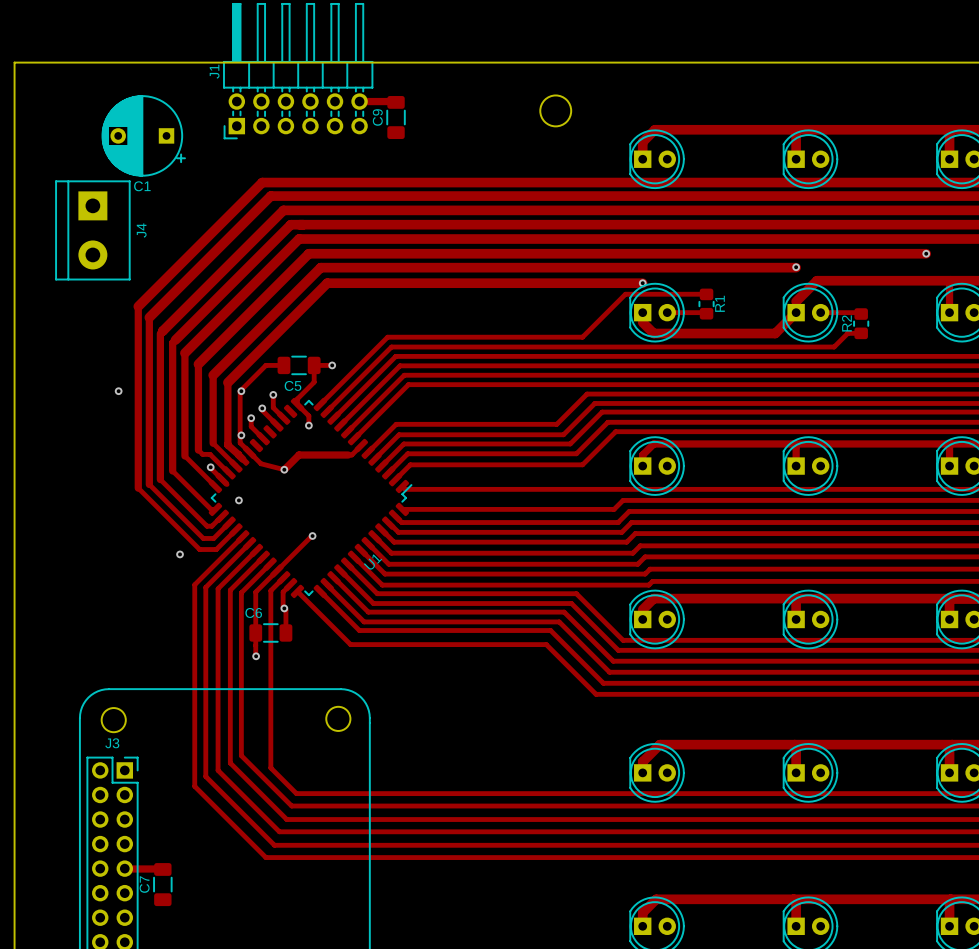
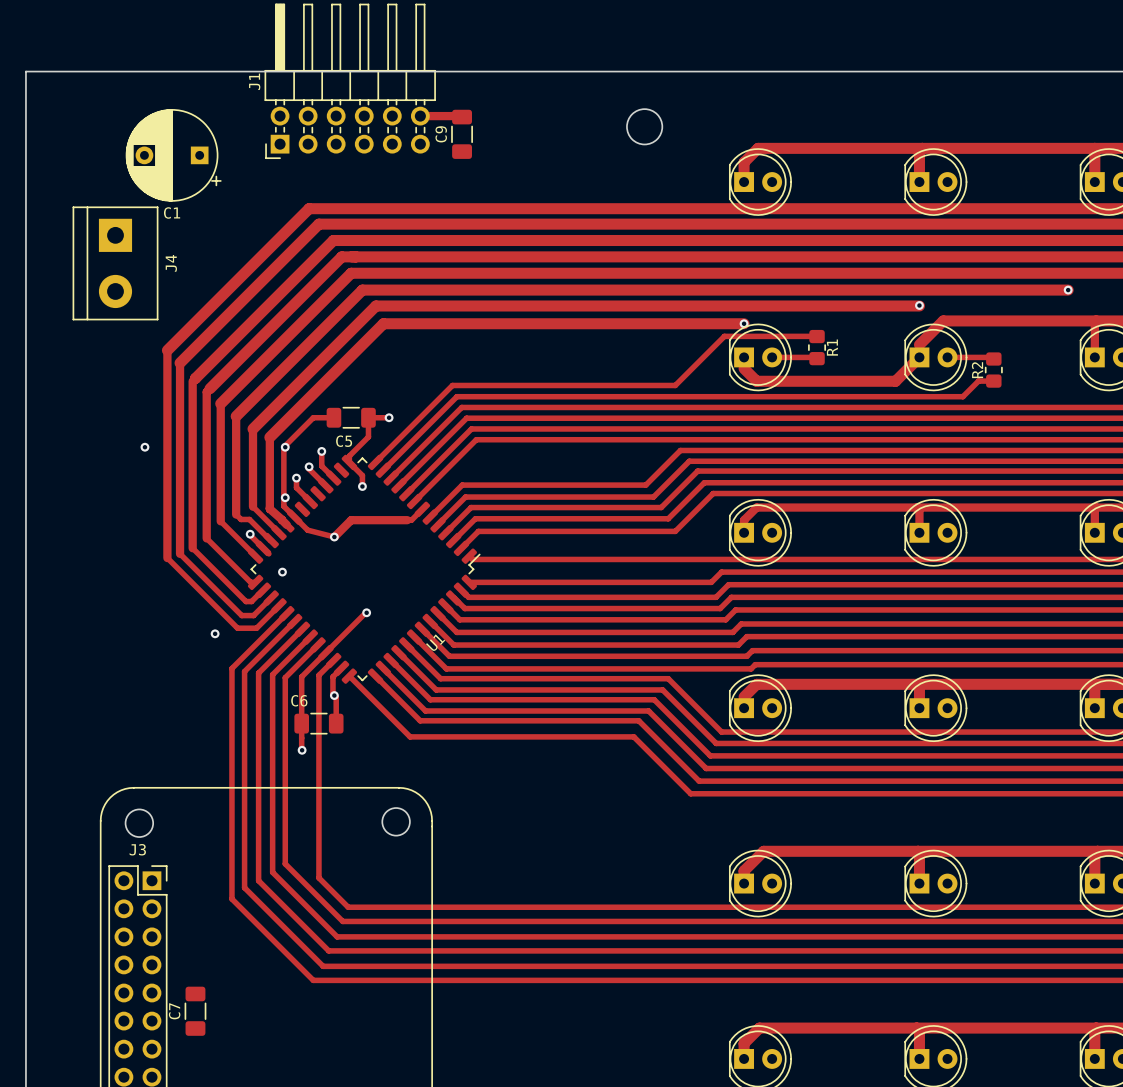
track: (125, 868) (164, 868) -> none

